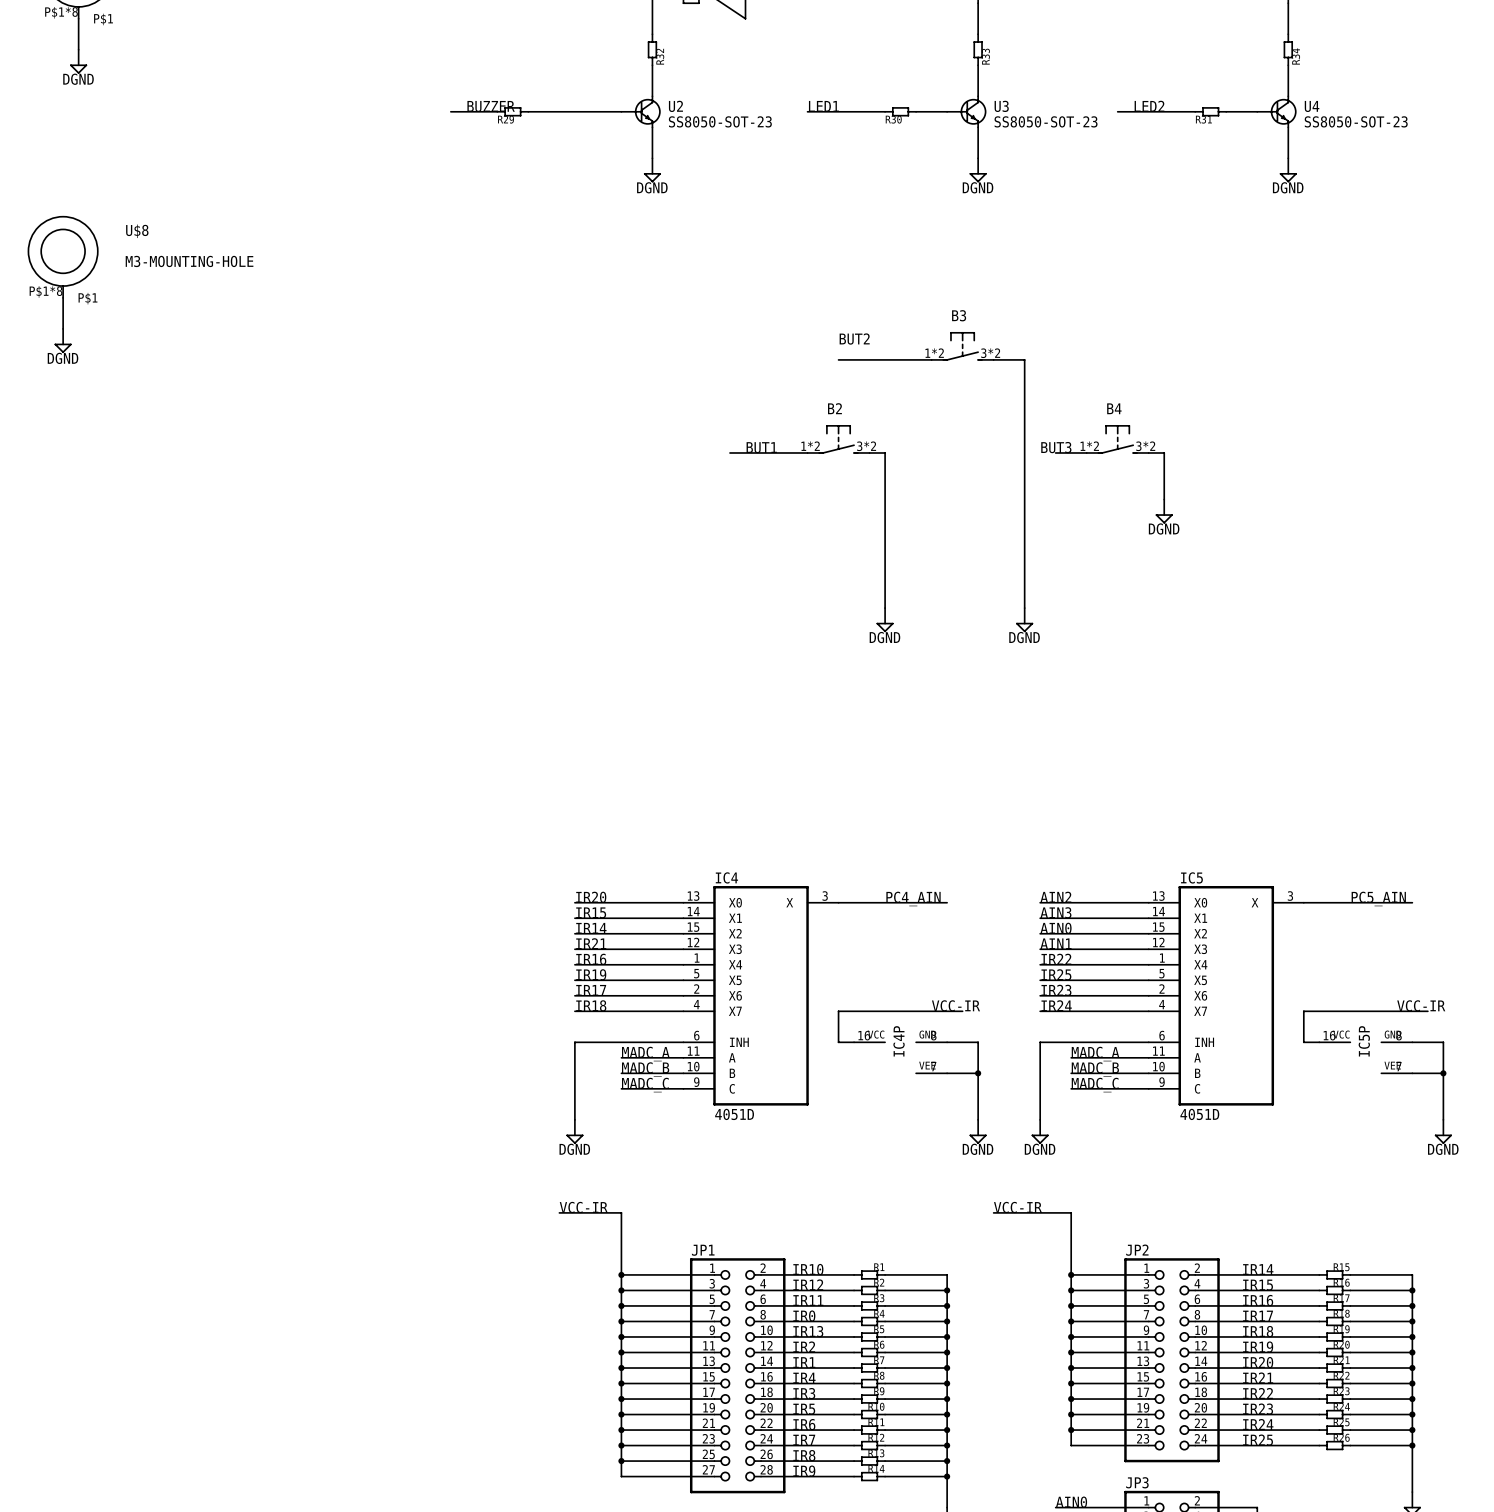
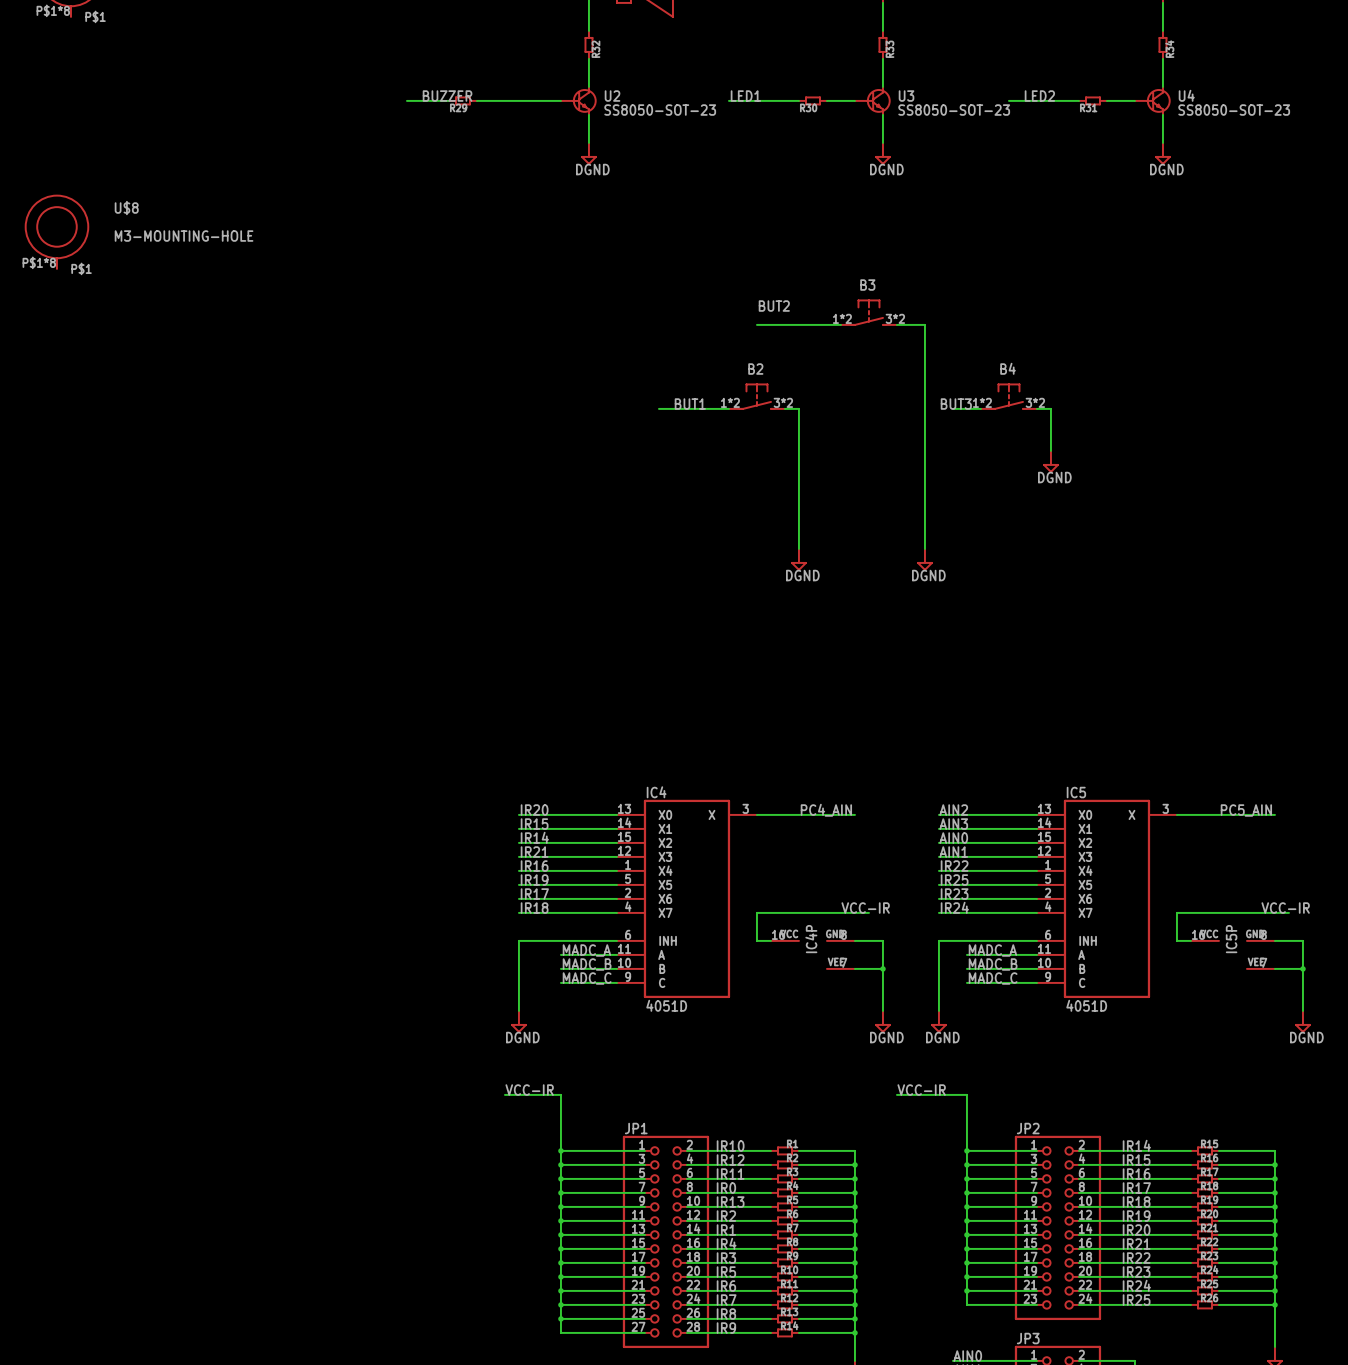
wire: (78, 18) (78, 49) -> none
power symbol: DGND (78, 61) -> none
wire: (63, 297) (63, 328) -> none
power symbol: DGND (63, 340) -> none

